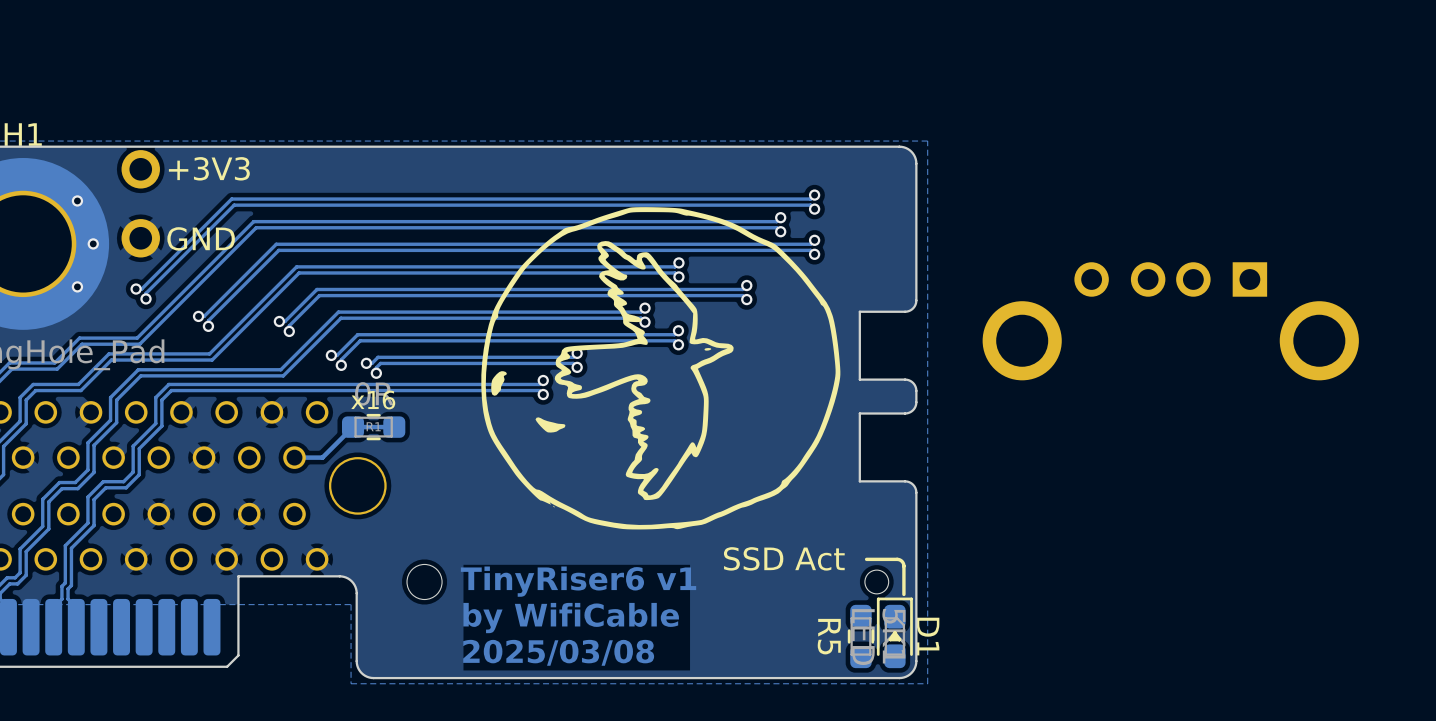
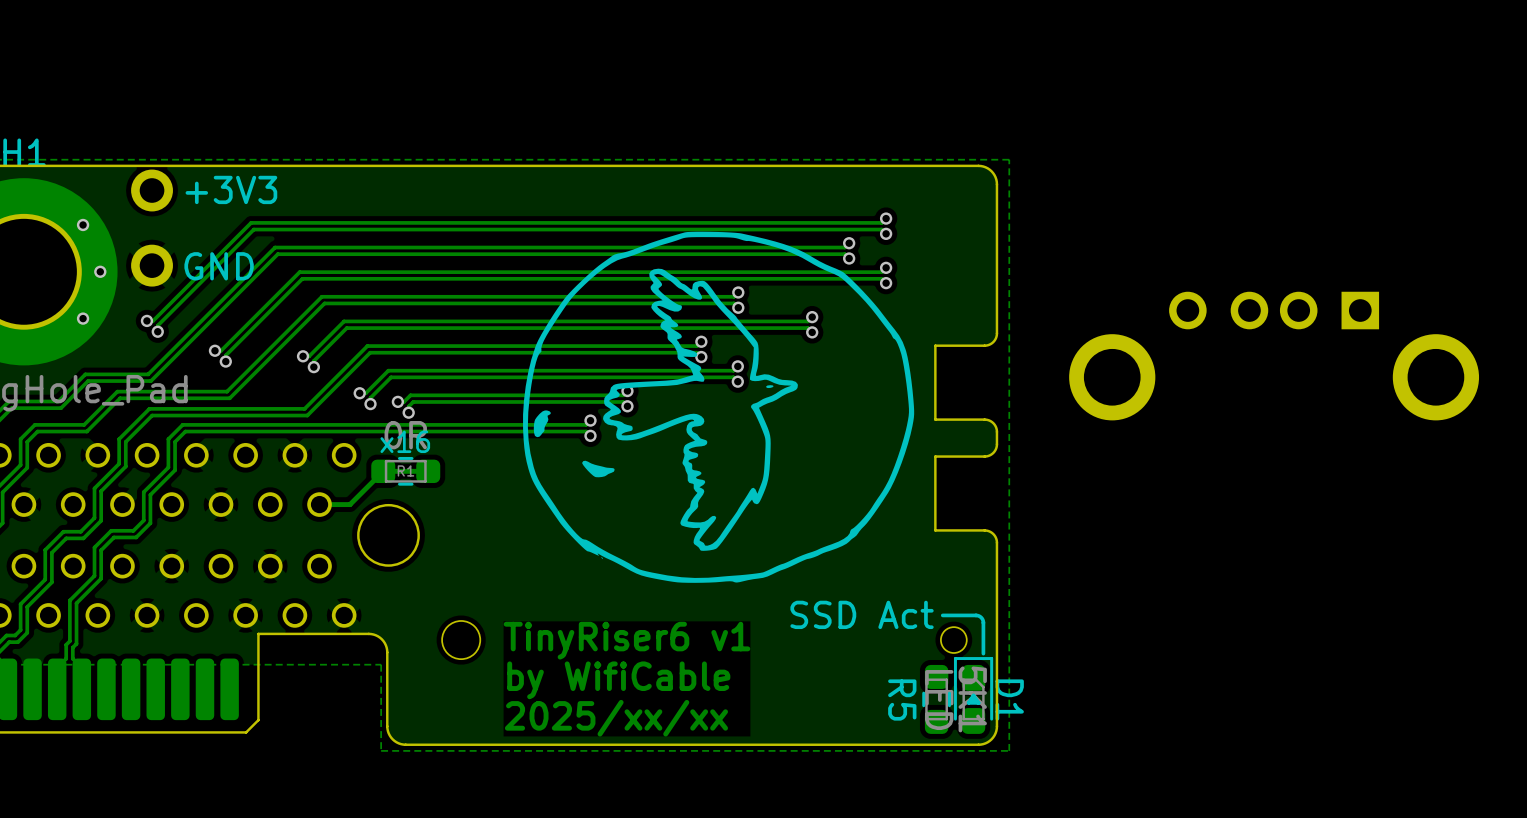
text: 2025/03/08 (558, 652) -> 2025/xx/xx (616, 718)

